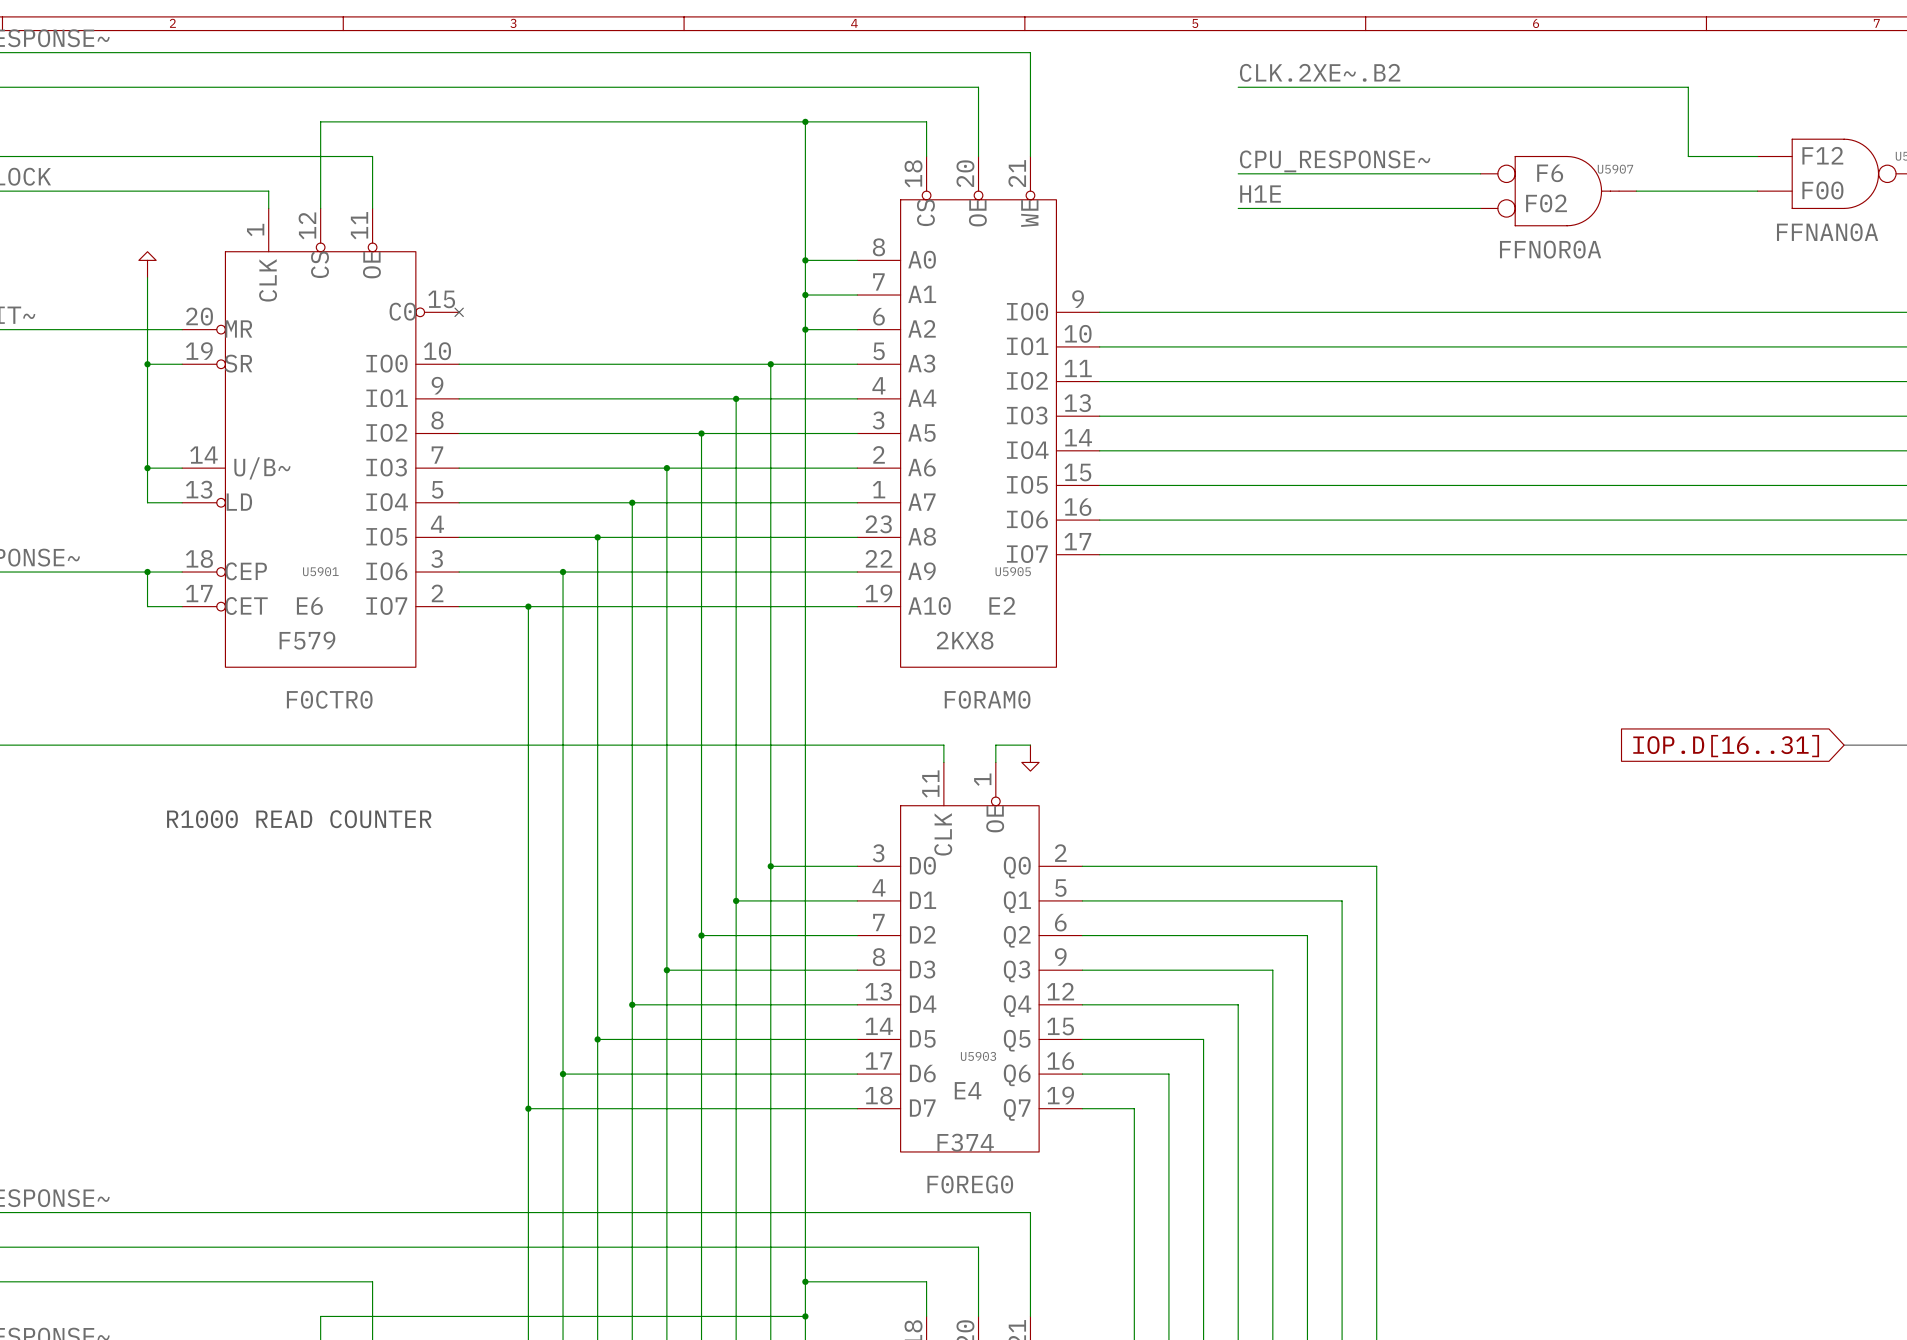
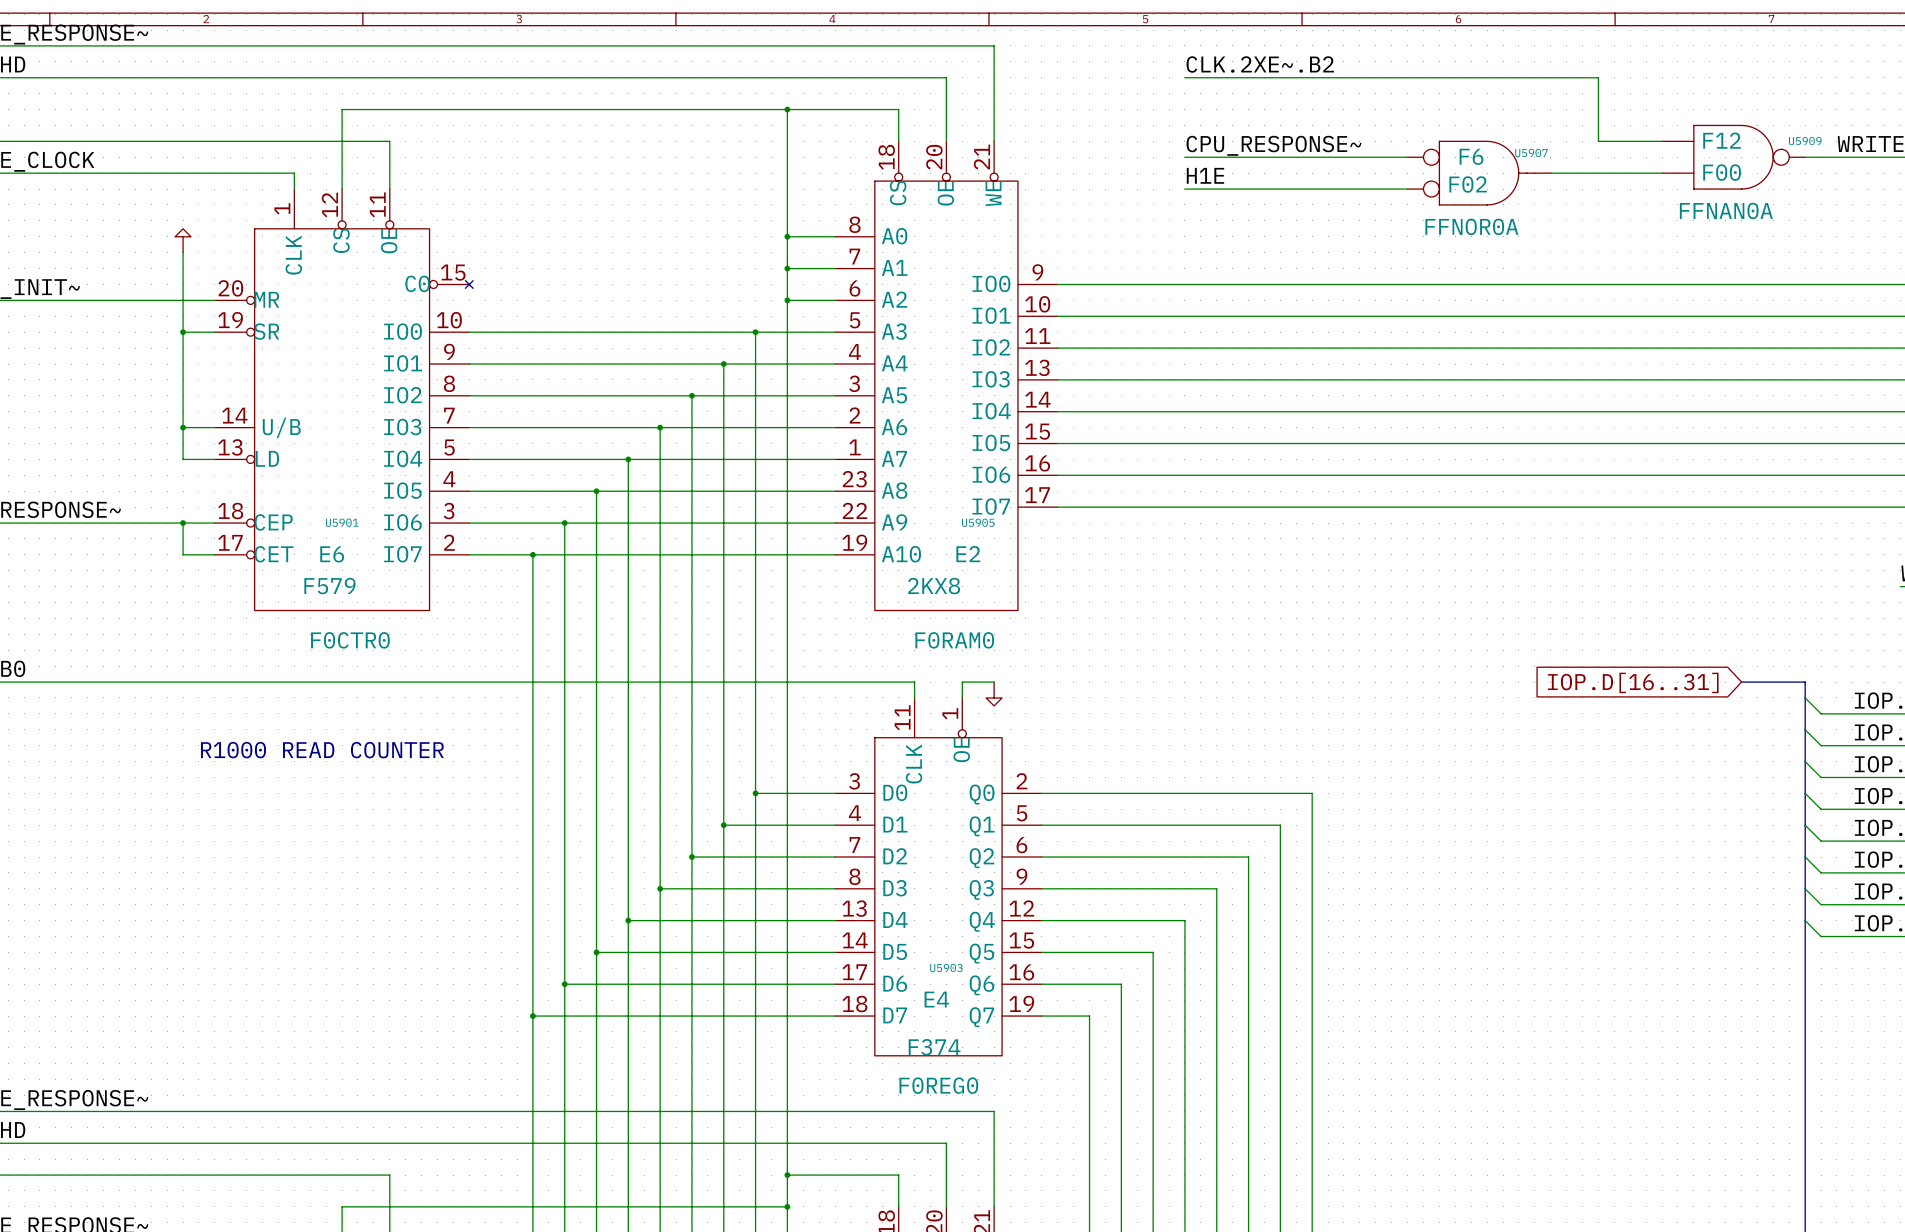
U5901 pin name: U/B~ (262, 468) -> U/B (281, 427)

